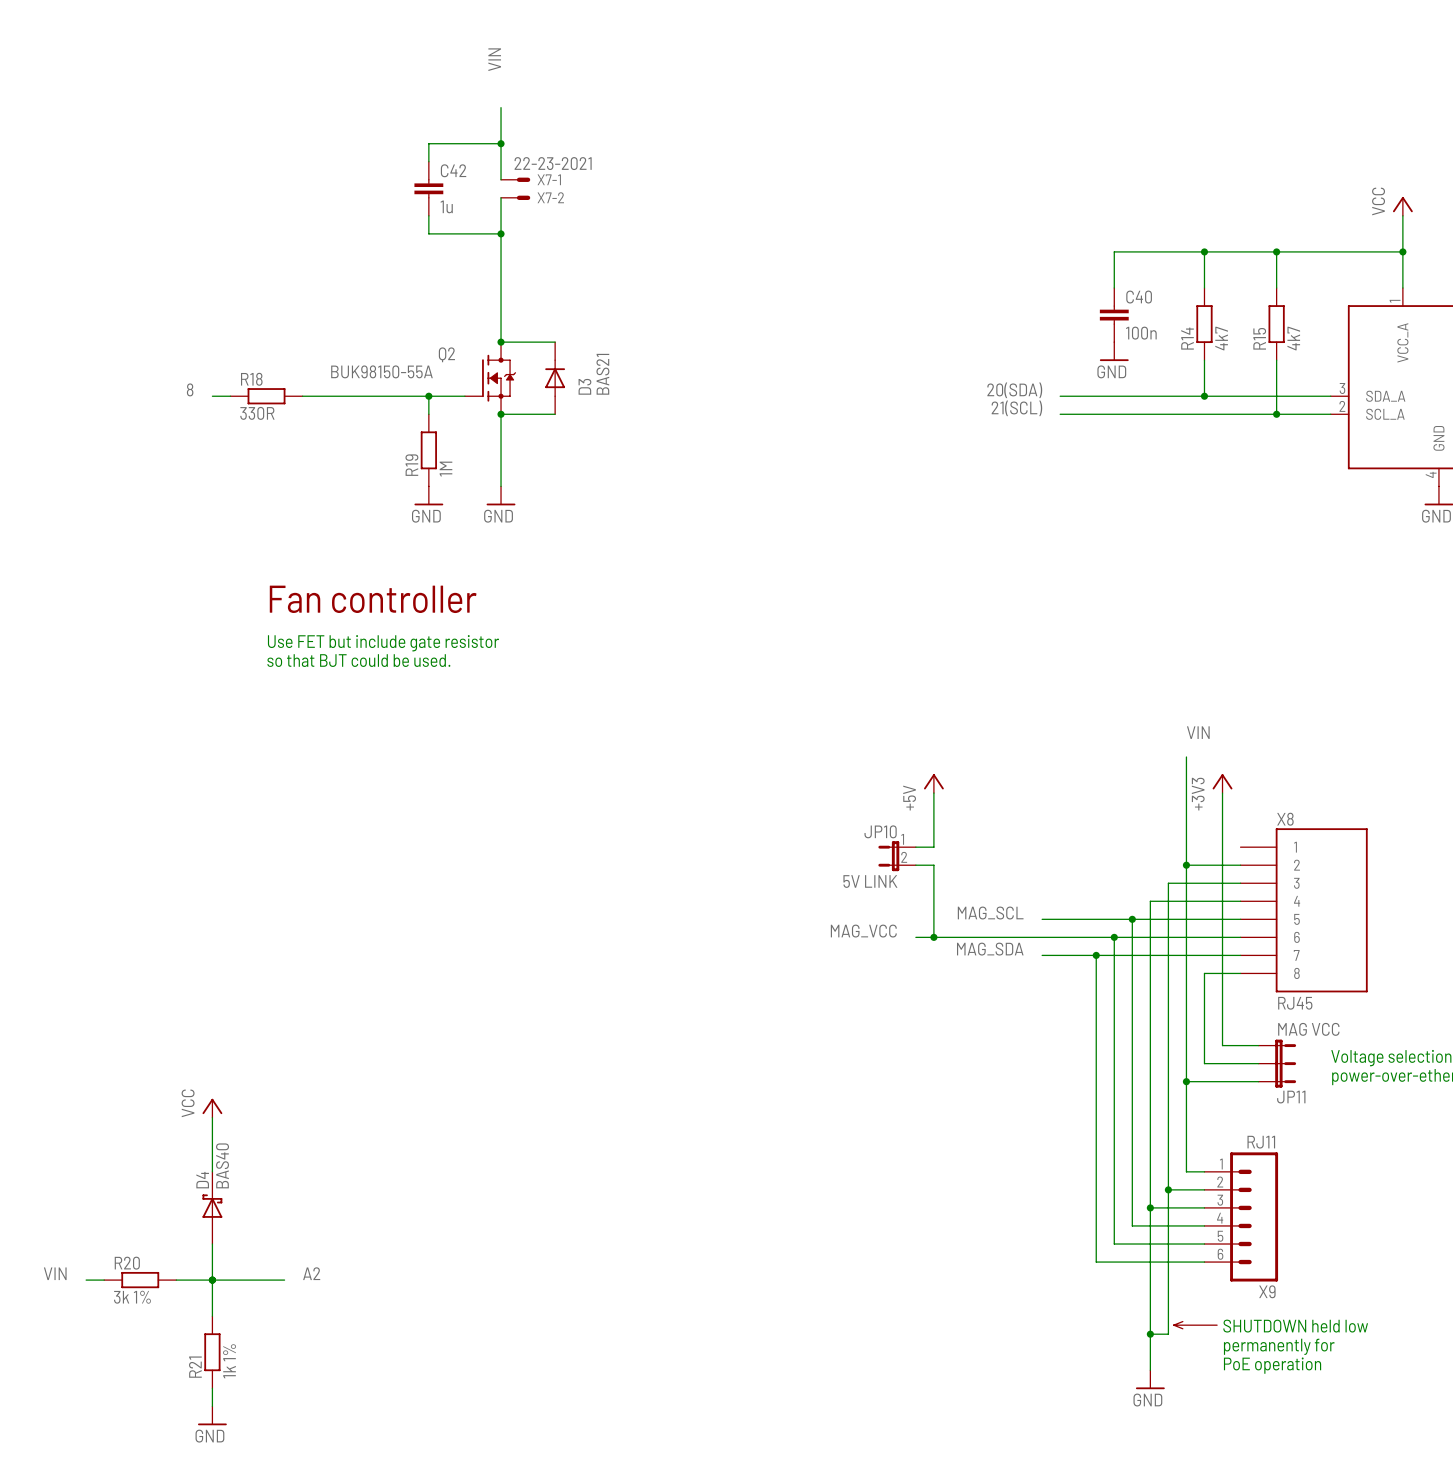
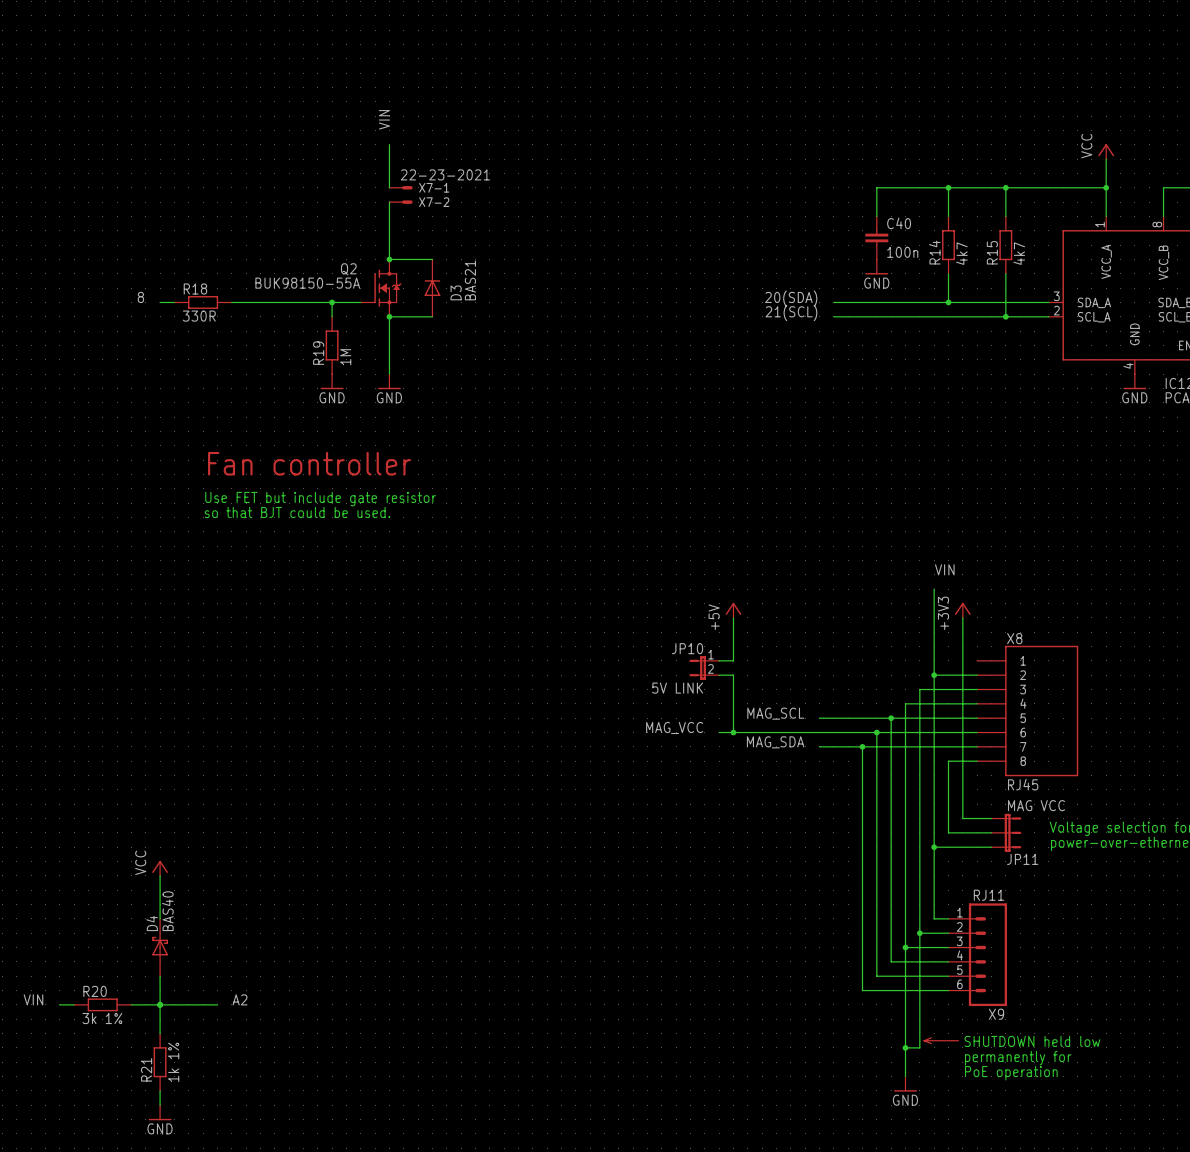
label position: VIN (494, 59) -> VIN (384, 119)
wire: (501, 107) (501, 179) -> none
wire: (501, 143) (428, 143) (428, 161) -> none
junction: (501, 143) -> none
X7-1 position: (515, 179) -> (401, 187)
C42: 1u (428, 188) -> none
X7-2 position: (515, 197) -> (401, 202)
wire: (428, 215) (428, 233) (501, 233) -> none
junction: (501, 233) -> none
wire: (501, 251) (501, 269) -> none

